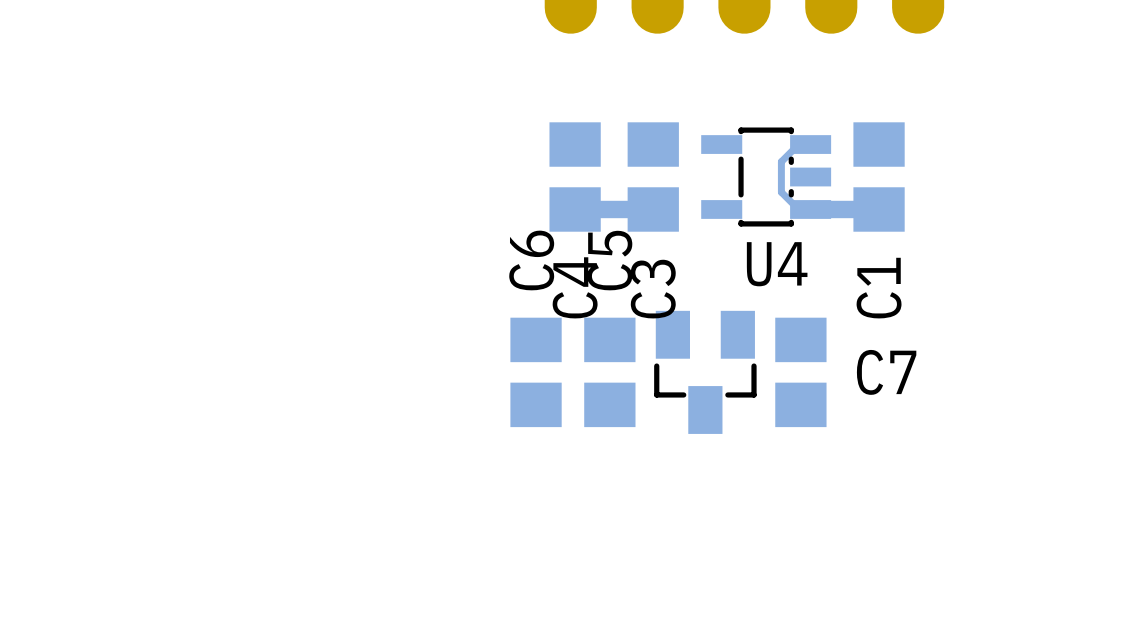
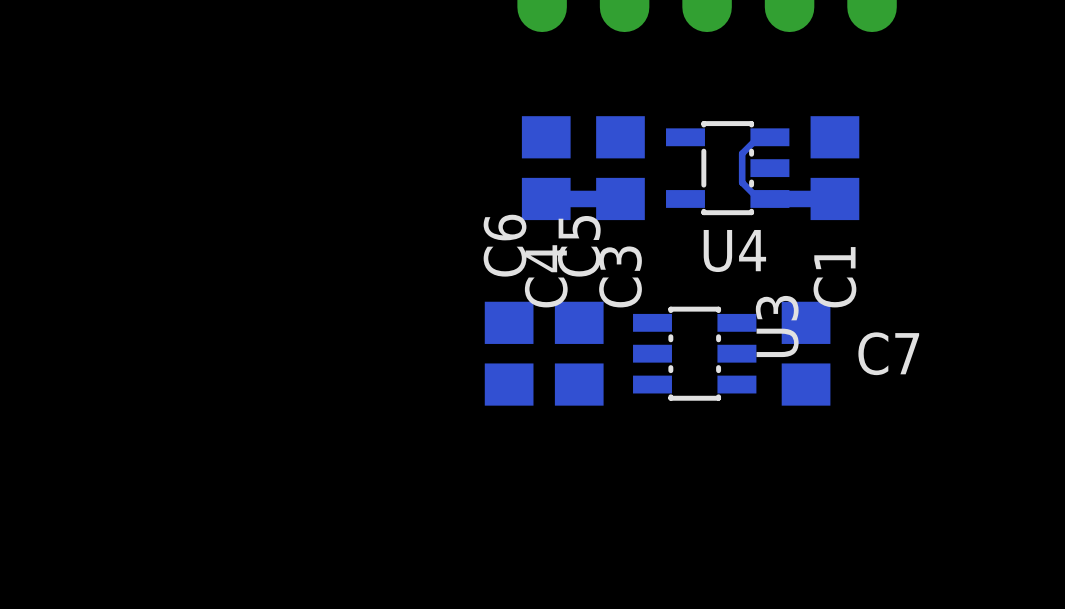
part: (705, 372) -> none
U3: none -> (694, 353)
C7 position: (800, 372) -> (806, 353)

